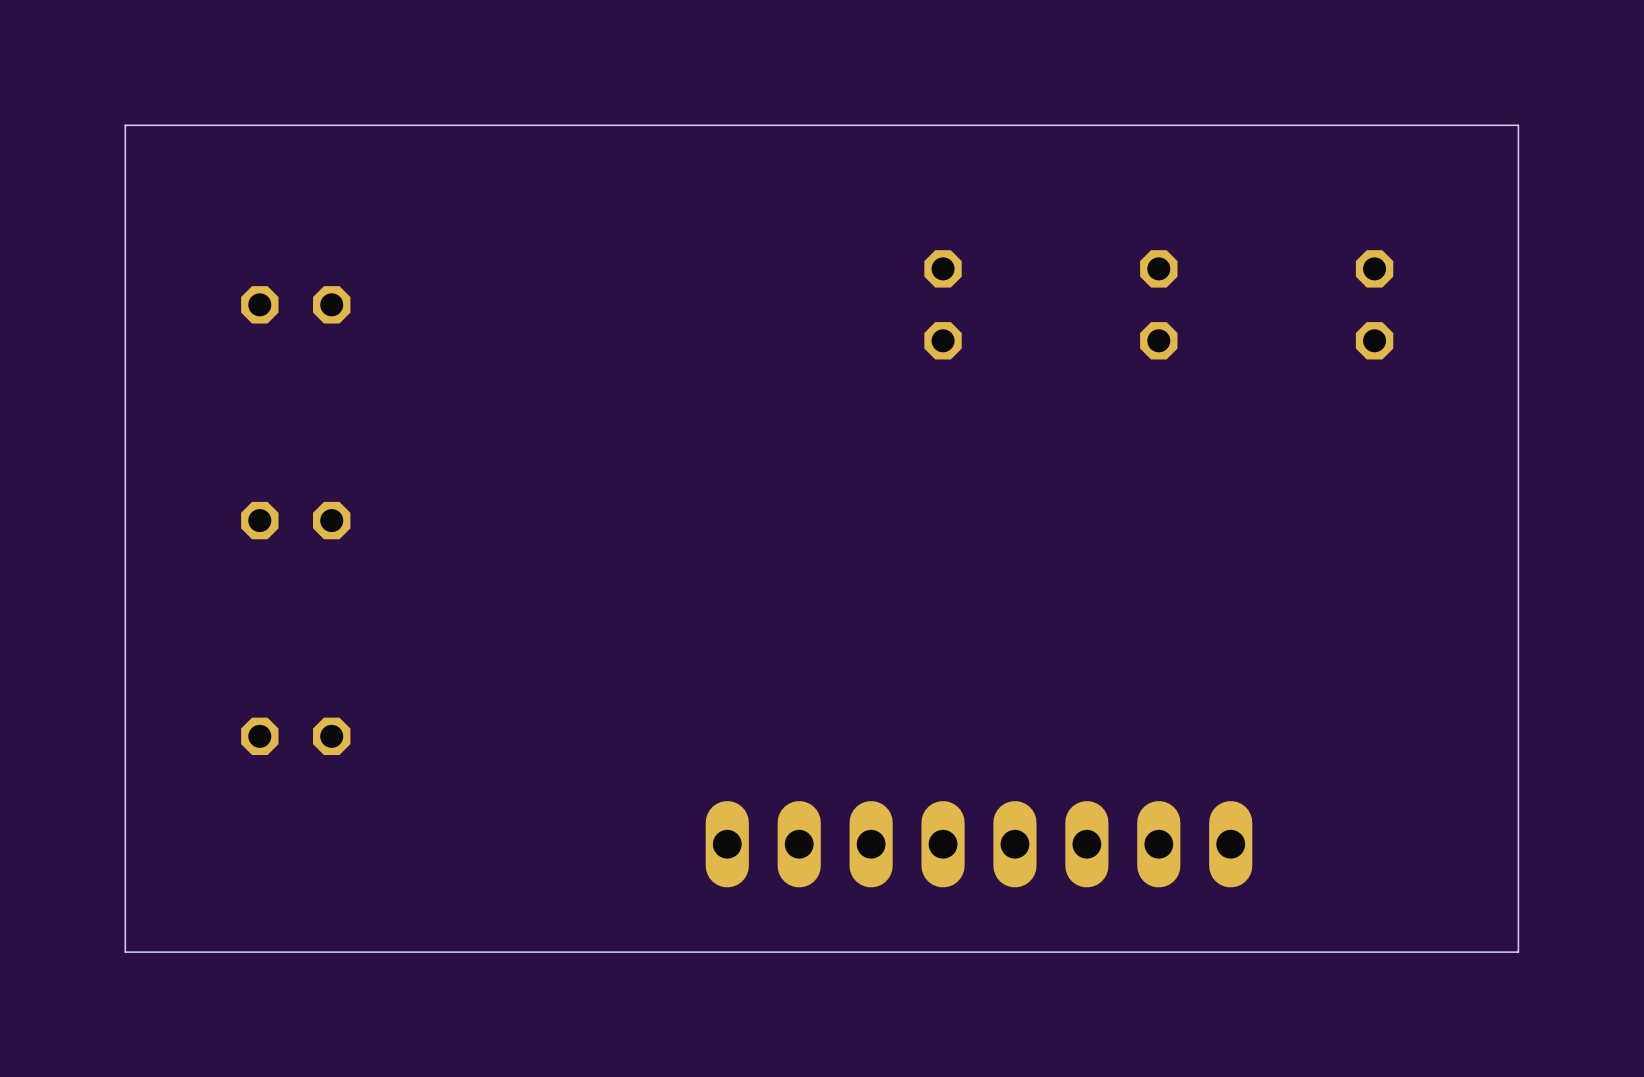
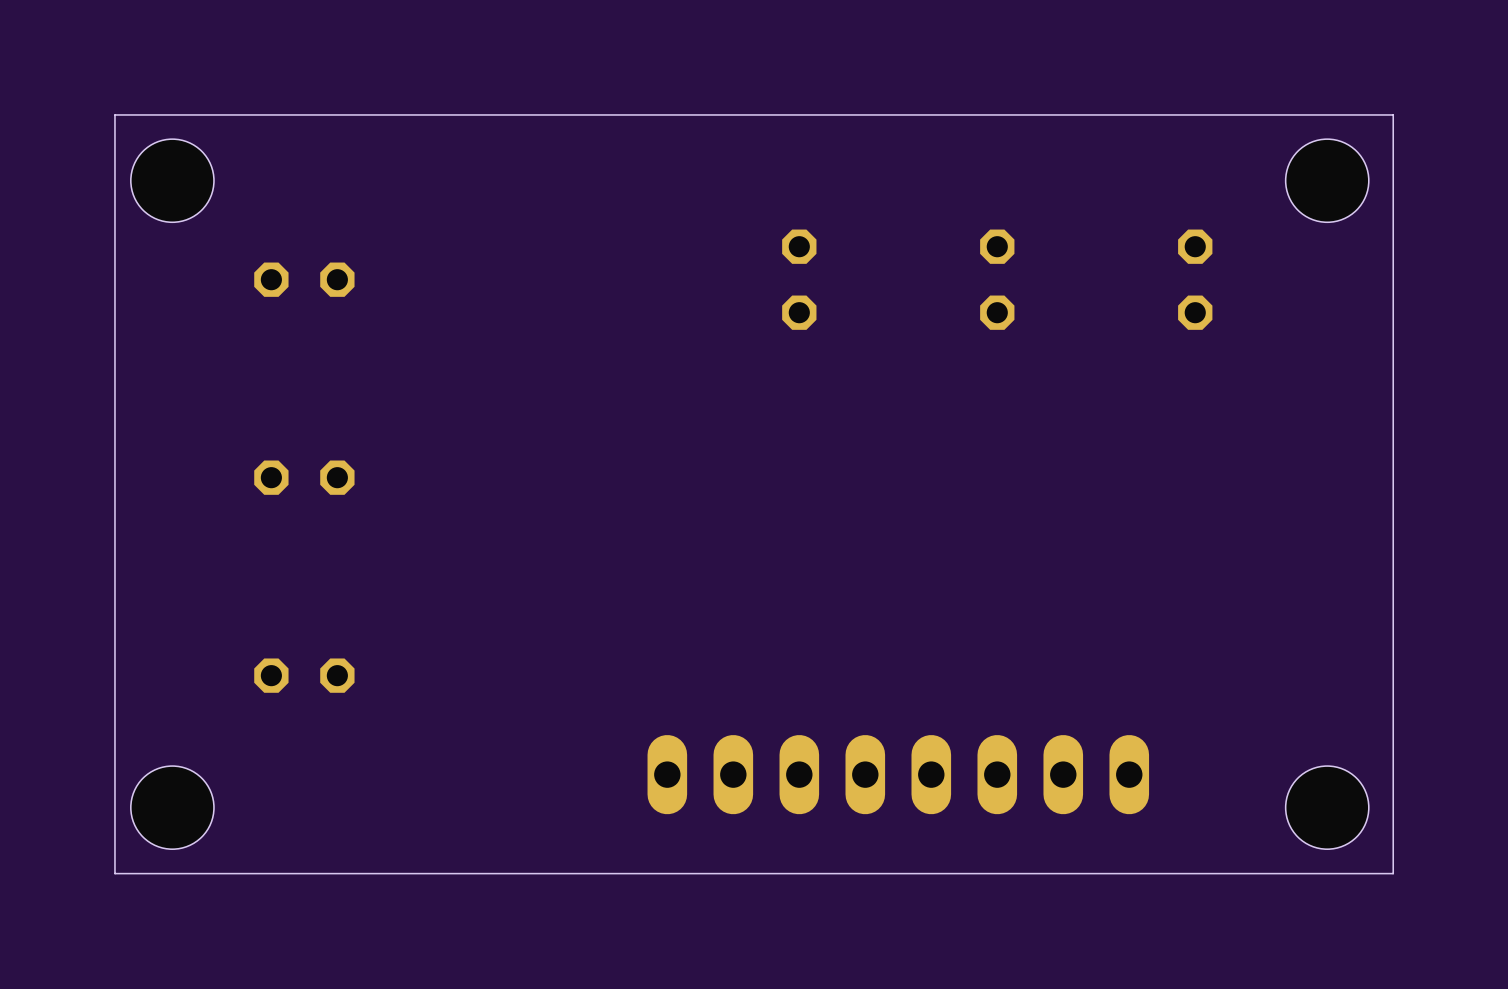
hole: none -> (172, 180)
hole: none -> (1327, 180)
part position: (295, 304) -> (304, 279)
part: none -> (799, 279)
part: (943, 304) -> none
part: none -> (997, 279)
part: (1158, 304) -> none
part: none -> (1195, 279)
part: (1374, 304) -> none
part position: (295, 520) -> (304, 477)
part position: (295, 736) -> (304, 675)
hole: none -> (172, 807)
hole: none -> (1327, 807)

